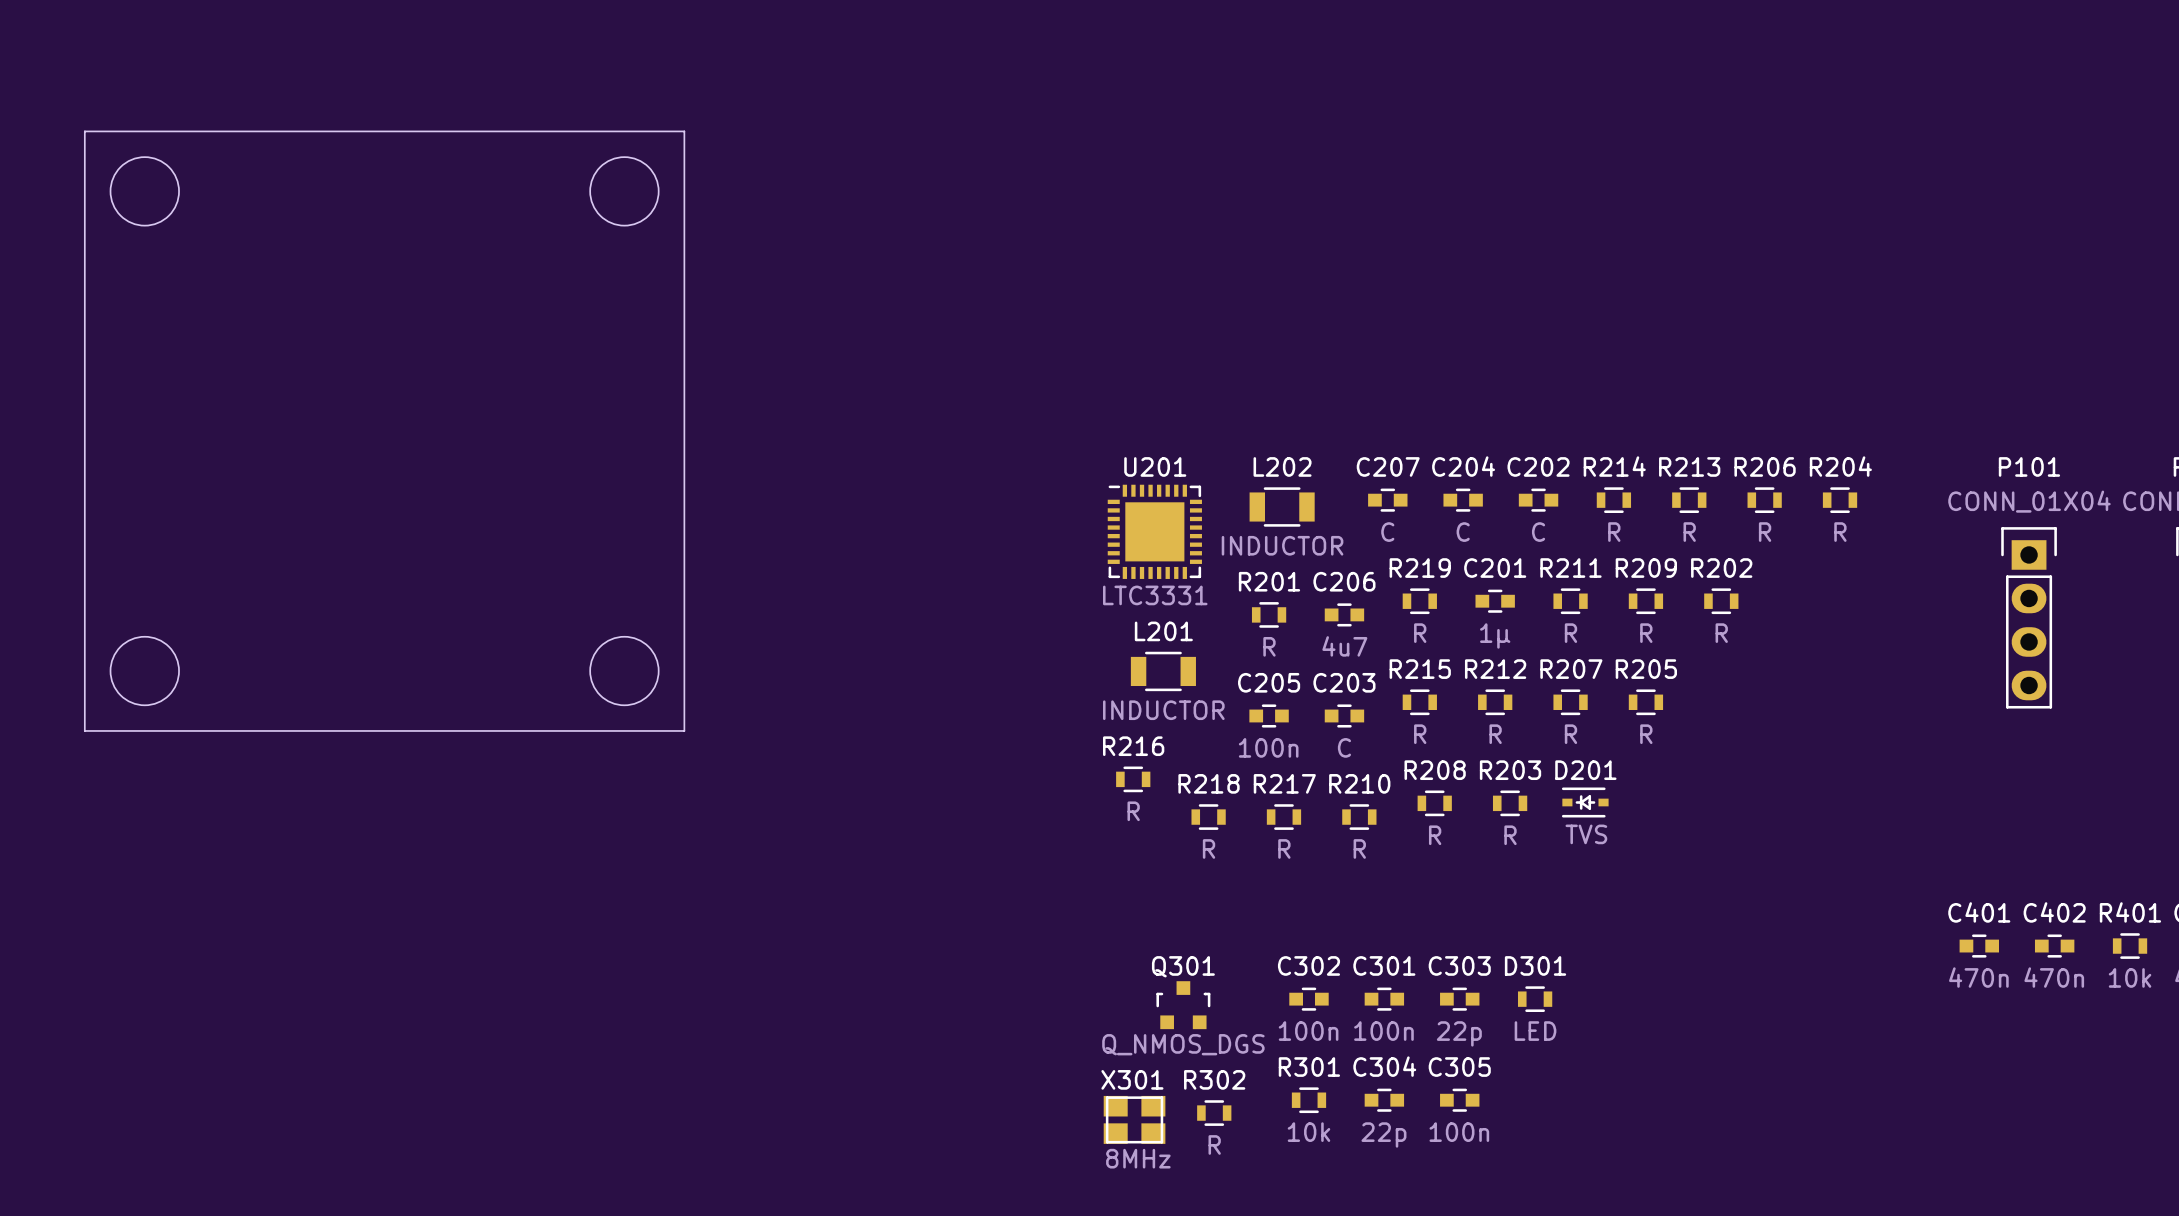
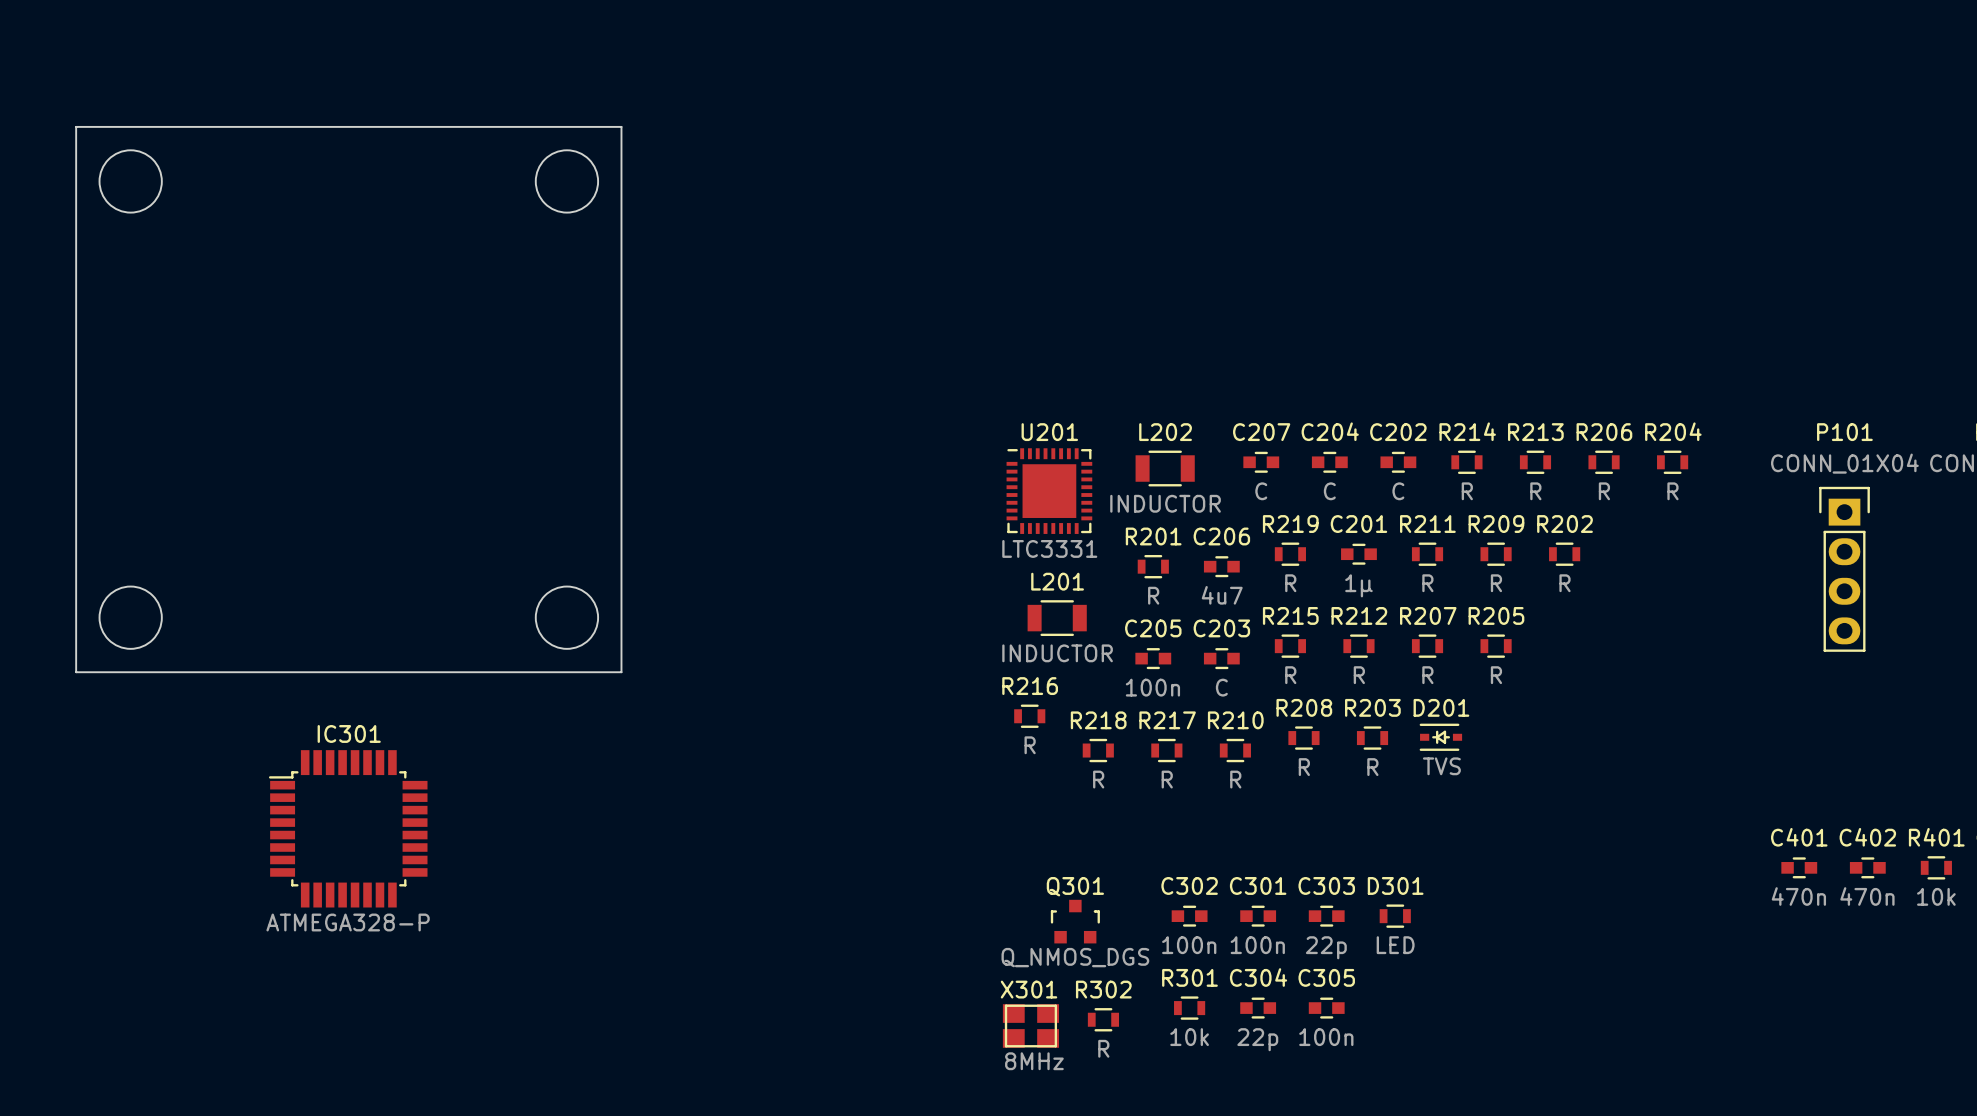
IC301: none -> ATMEGA328-P (348, 828)

